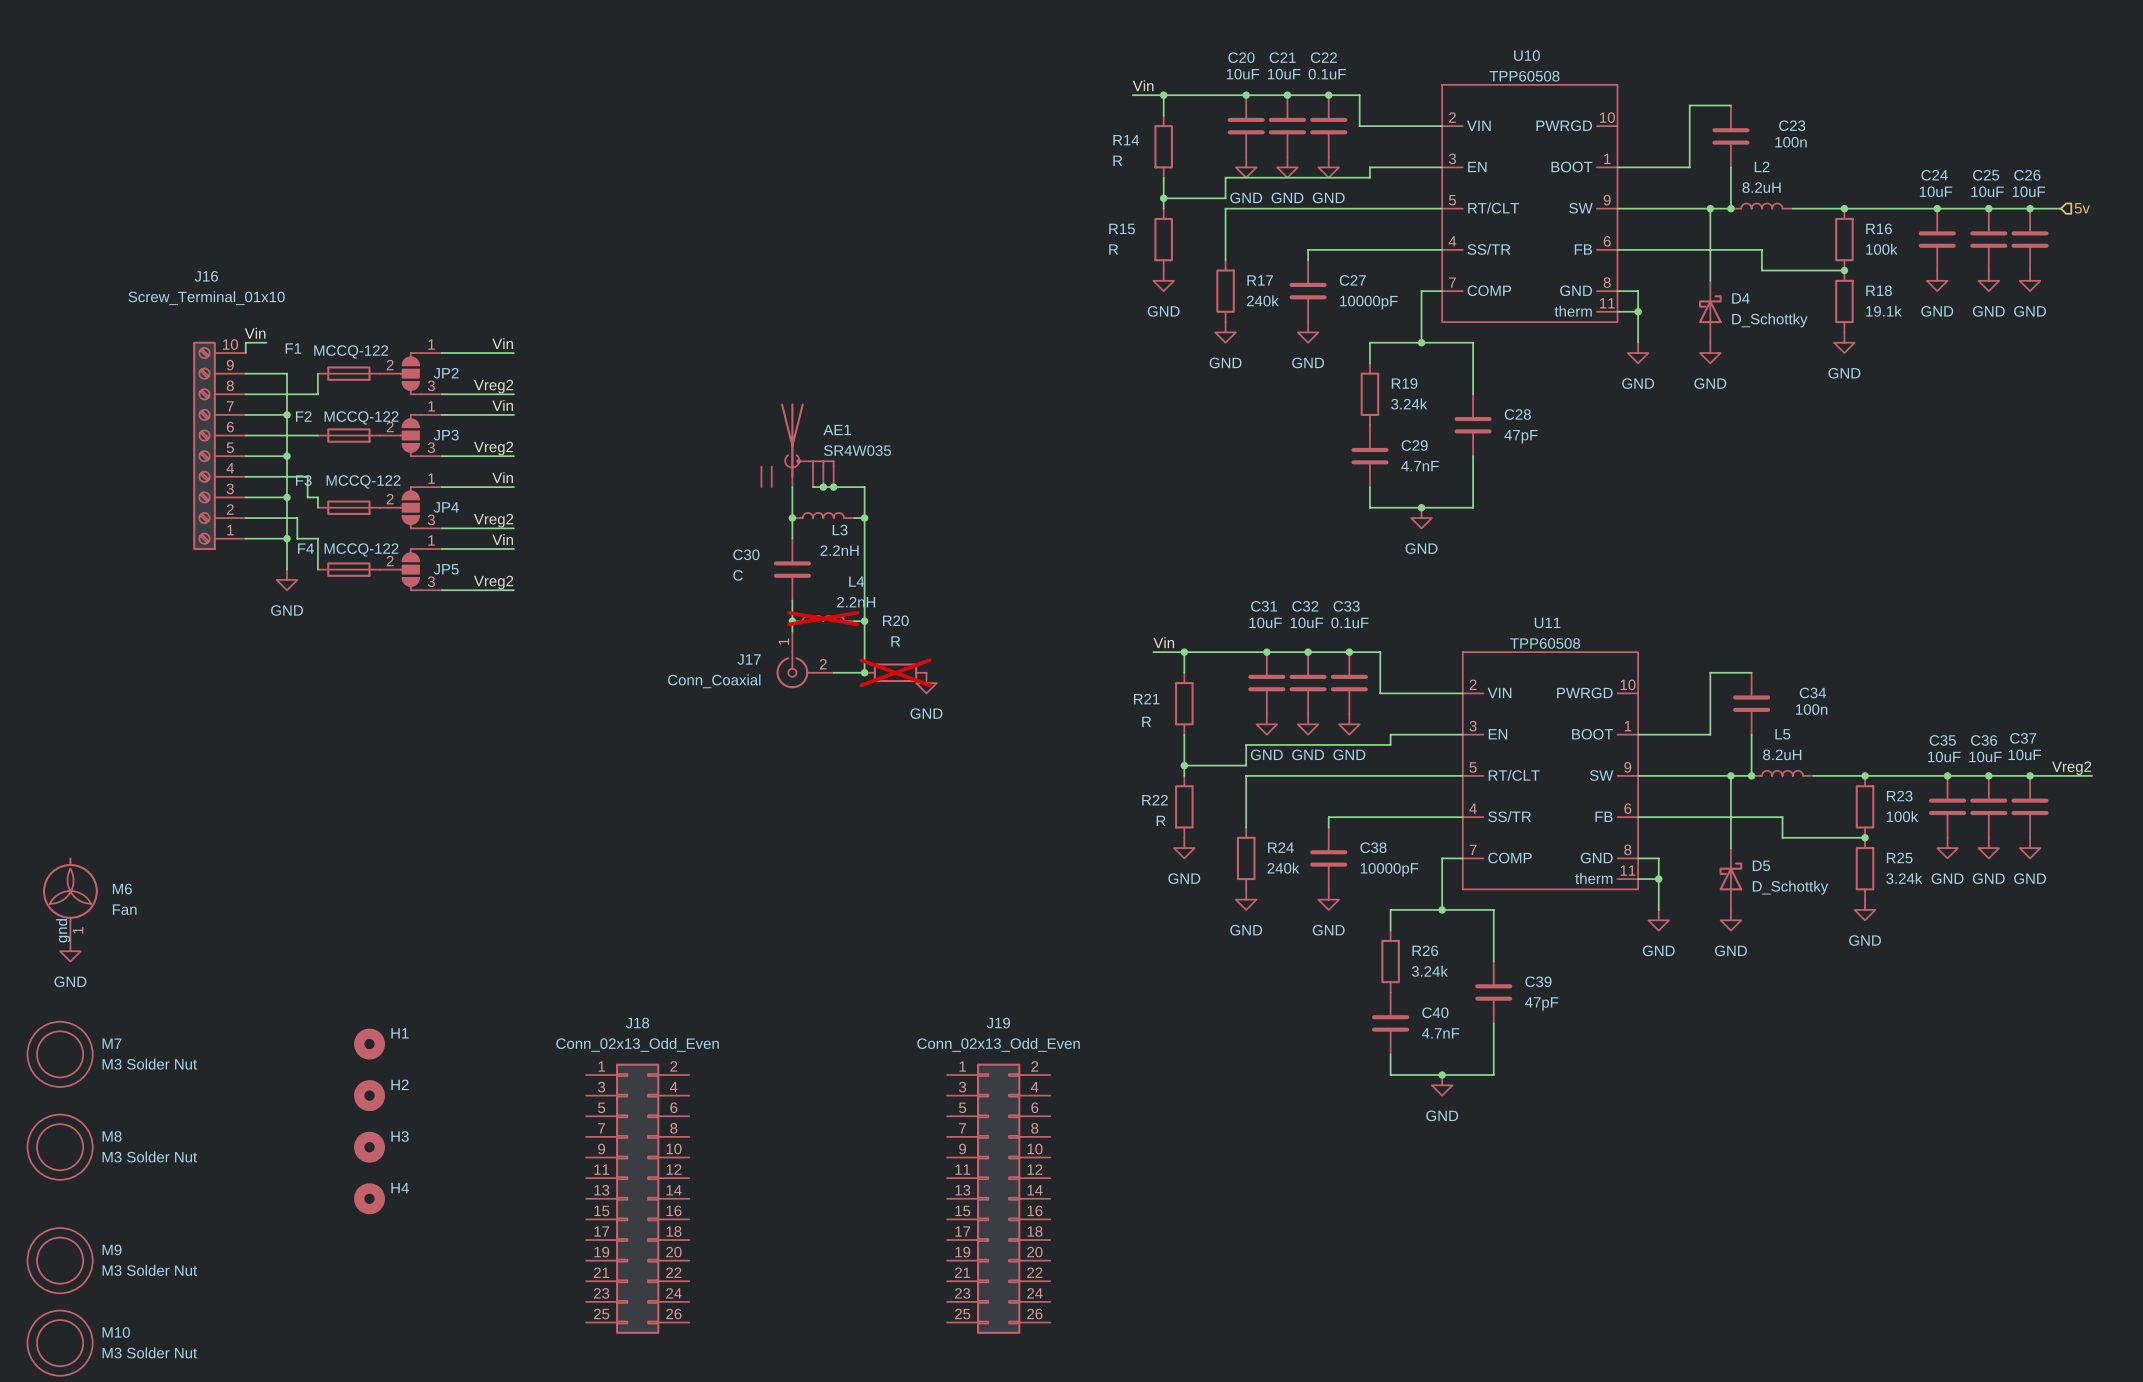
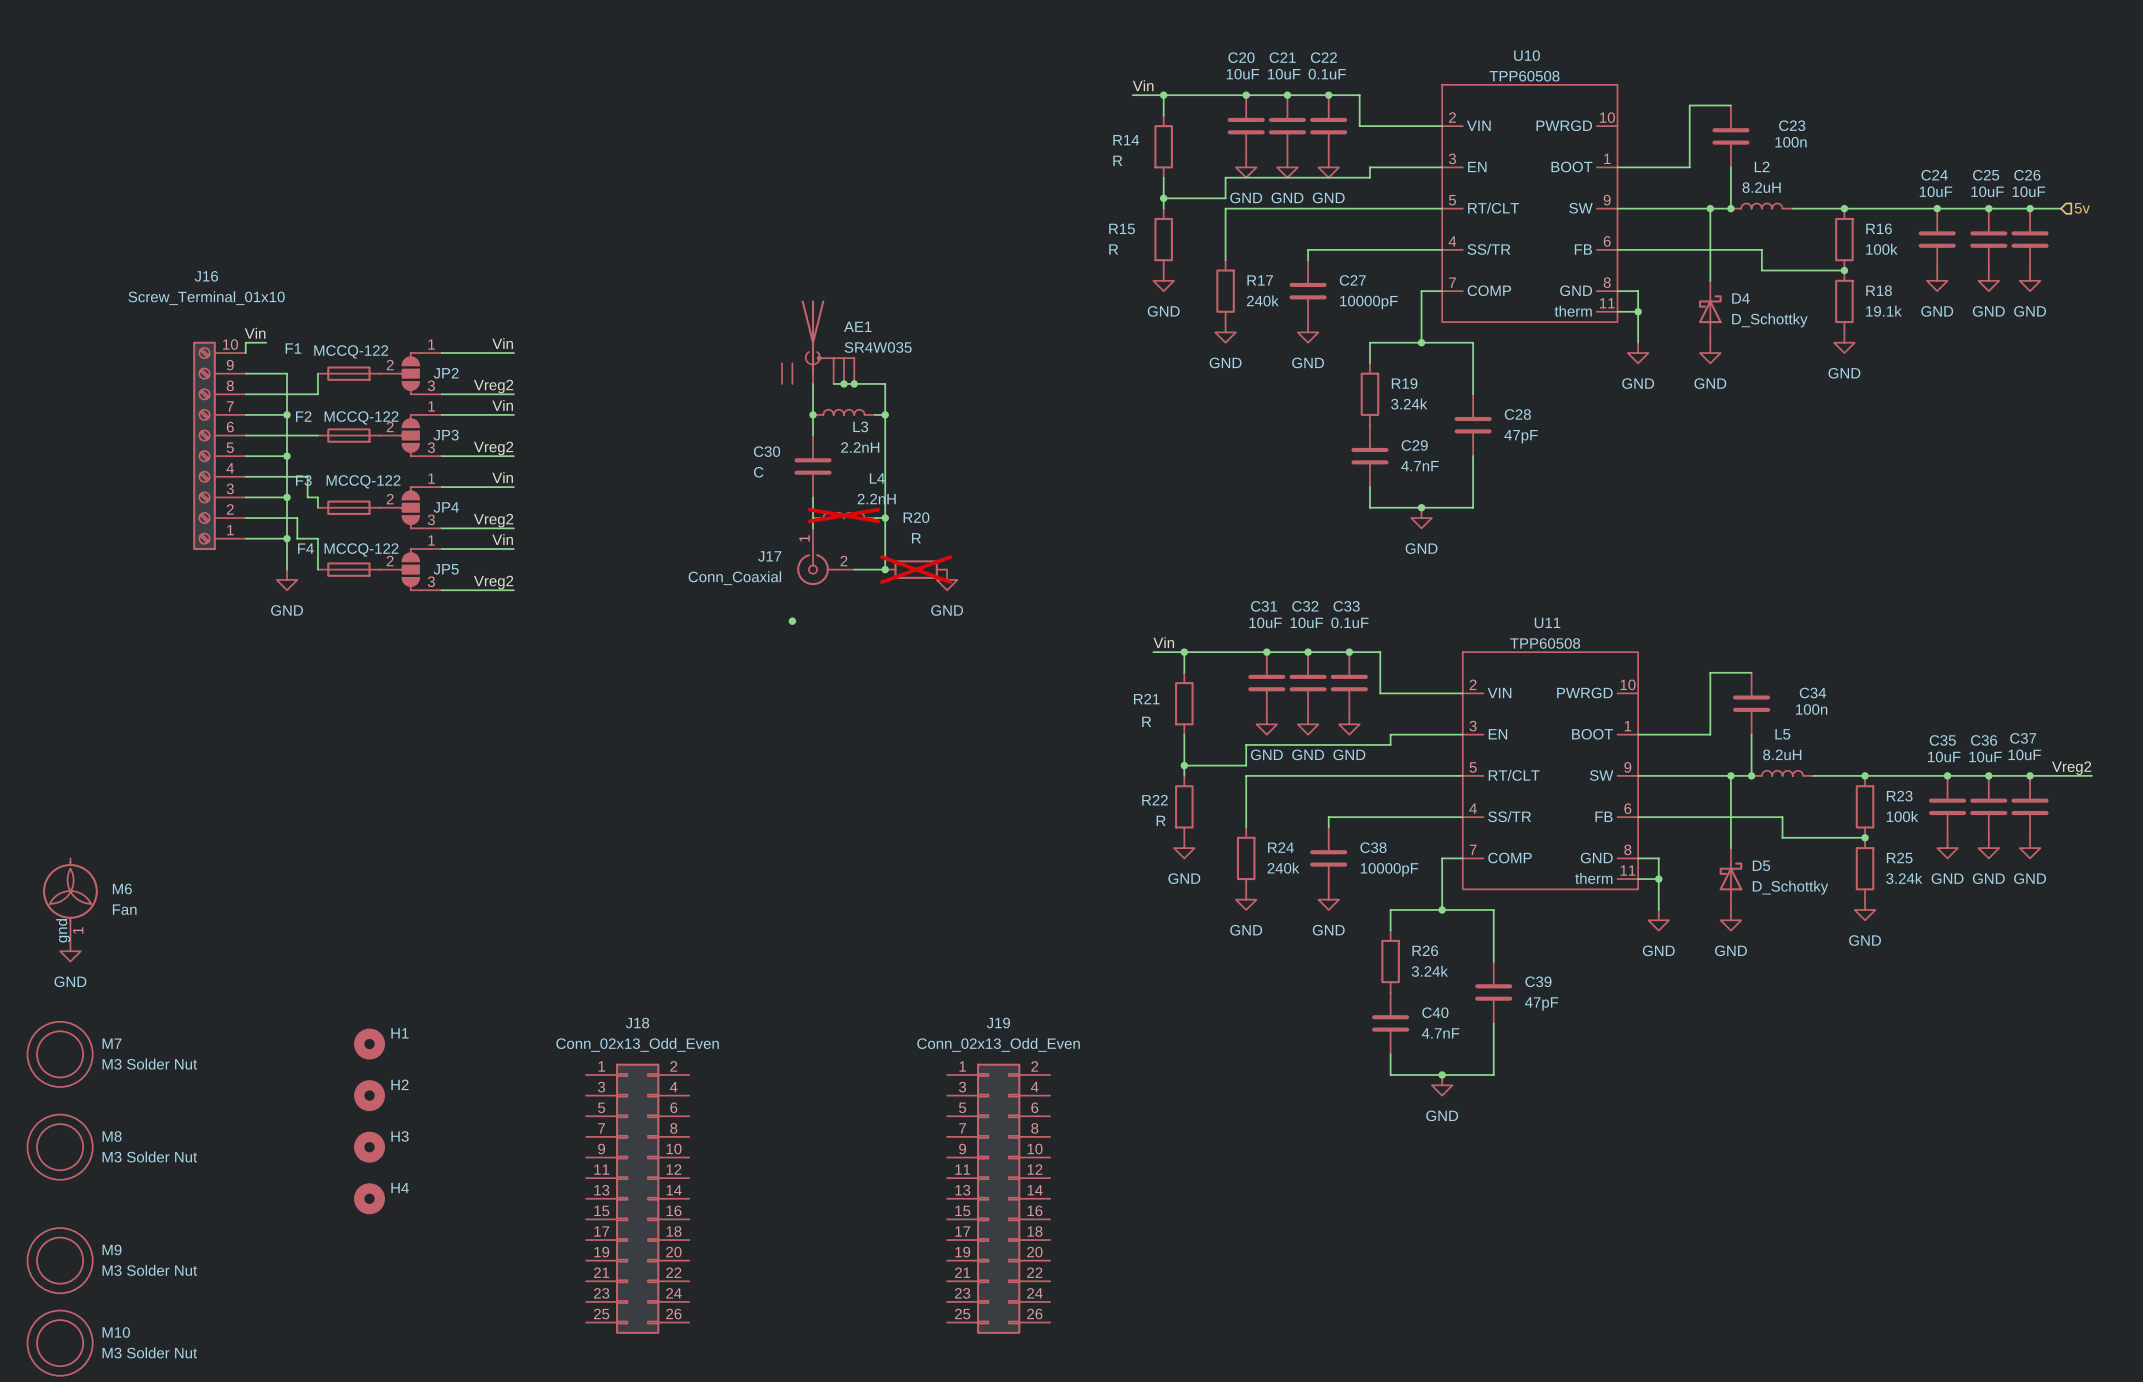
junction: none -> (843, 383)
junction: none -> (854, 383)
junction: none -> (813, 414)
junction: none -> (885, 414)
AE1 position: (797, 445) -> (818, 342)
wire: (792, 487) (792, 538) -> (813, 383) (813, 435)
wire: (813, 487) (864, 487) (864, 672) (833, 672) -> (833, 383) (885, 383) (885, 569) (854, 569)
junction: (823, 487) -> none
junction: (833, 487) -> none
L3 position: (823, 515) -> (843, 412)
junction: (792, 518) -> none
junction position: (864, 518) -> (885, 518)
C30 position: (792, 569) -> (813, 466)
junction: none -> (885, 569)
wire: (792, 600) (792, 631) -> (813, 497) (813, 528)
L4 position: (823, 618) -> (843, 515)
wire: (854, 621) (864, 621) -> (874, 518) (885, 518)
junction: (864, 621) -> none
J17 position: (805, 659) -> (825, 556)
junction: (864, 672) -> none
R20 position: (895, 672) -> (916, 569)
power symbol position: GND (926, 683) -> GND (947, 579)

